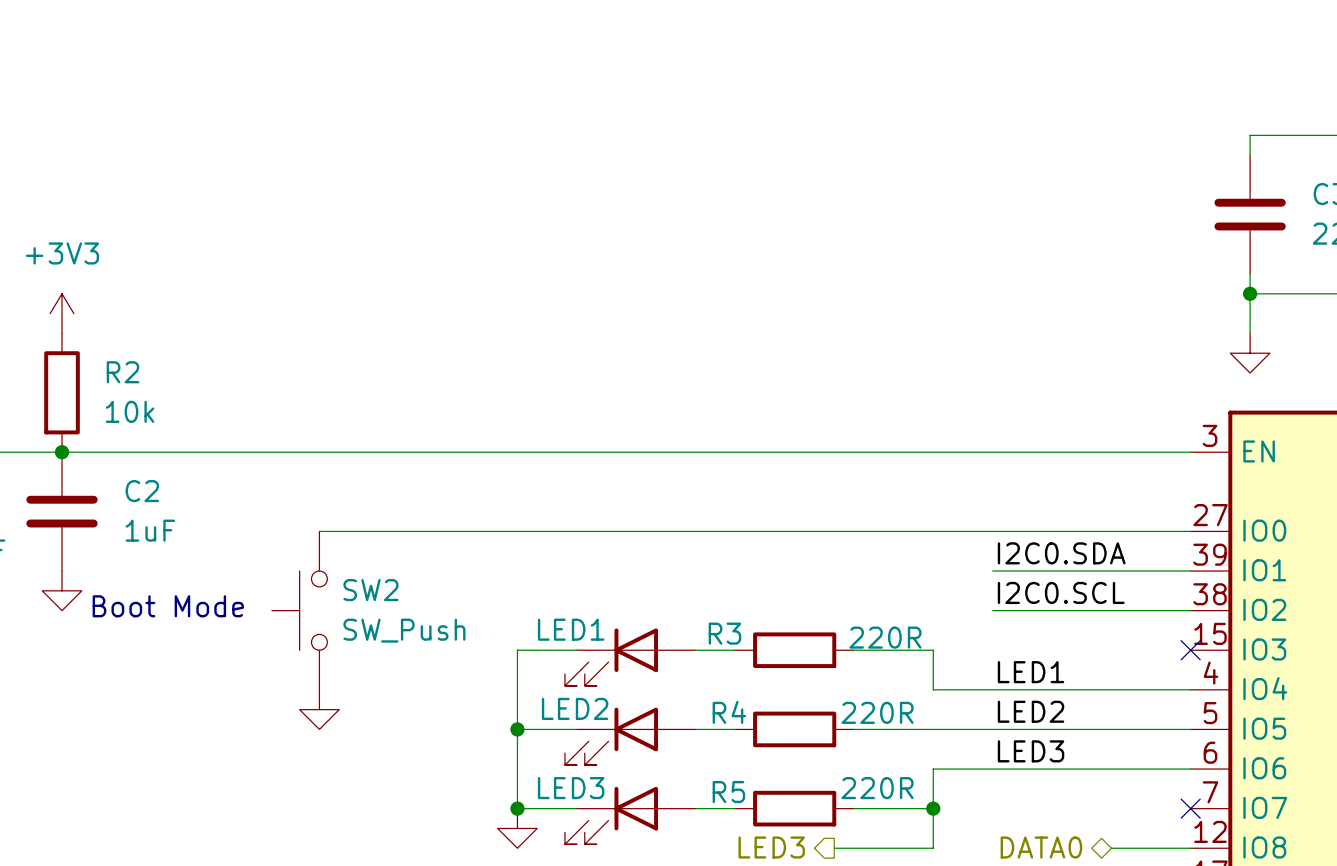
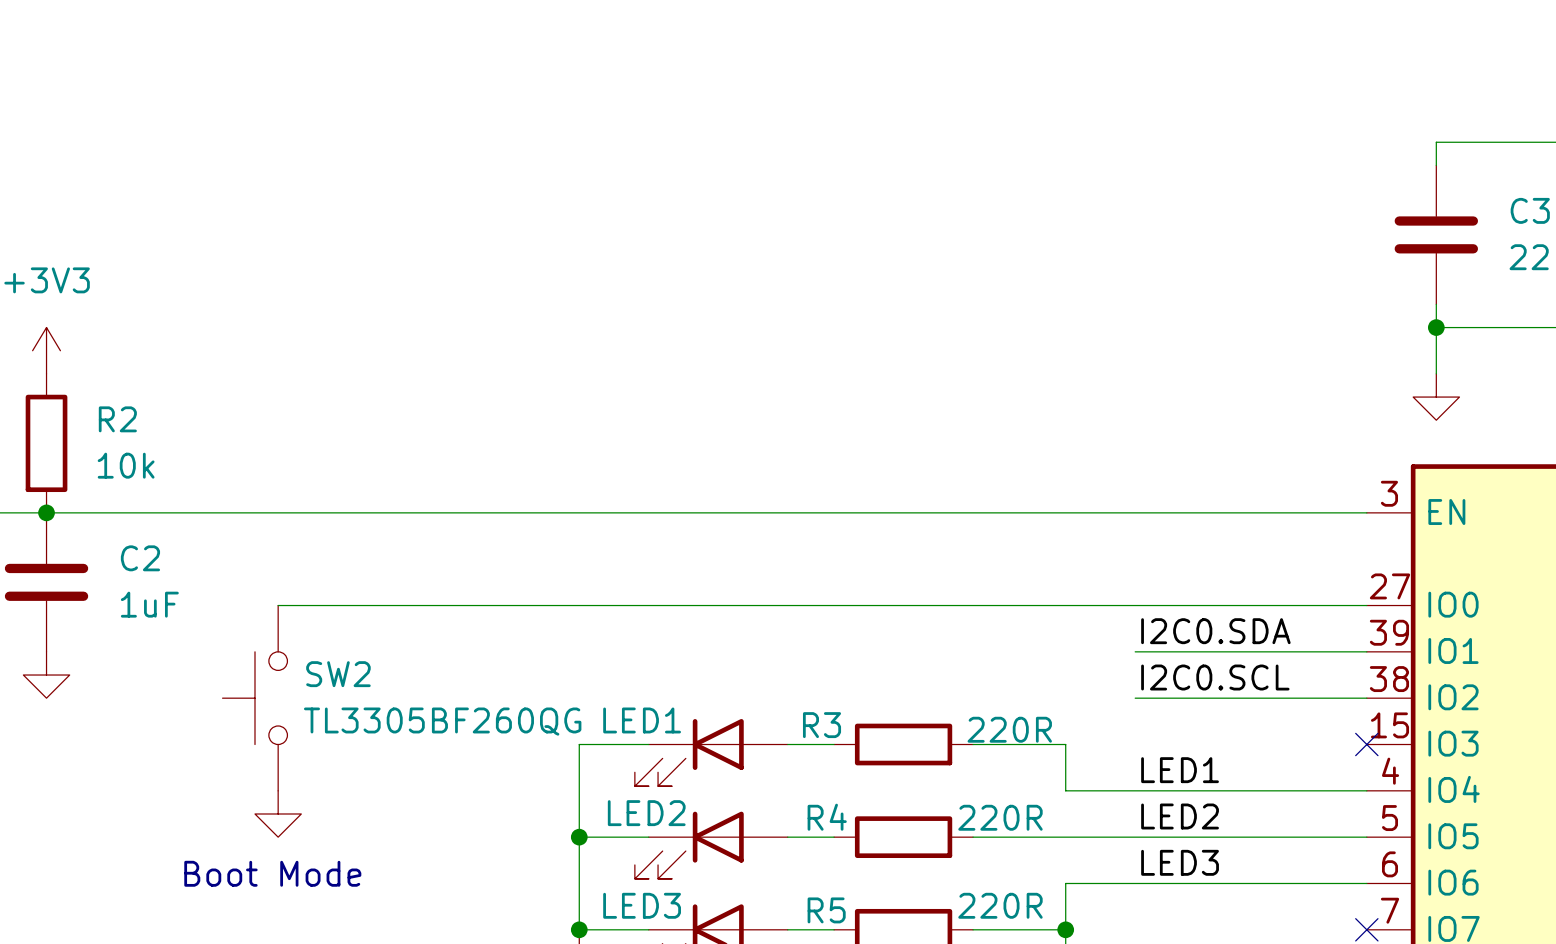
wire: none -> (278, 605) (347, 605)
text position: Boot Mode (168, 606) -> Boot Mode (272, 873)
SW2 position: (299, 610) -> (254, 698)
SW2 value: SW_Push (404, 630) -> TL3305BF260QG (442, 721)
power symbol position: (319, 709) -> (278, 813)

